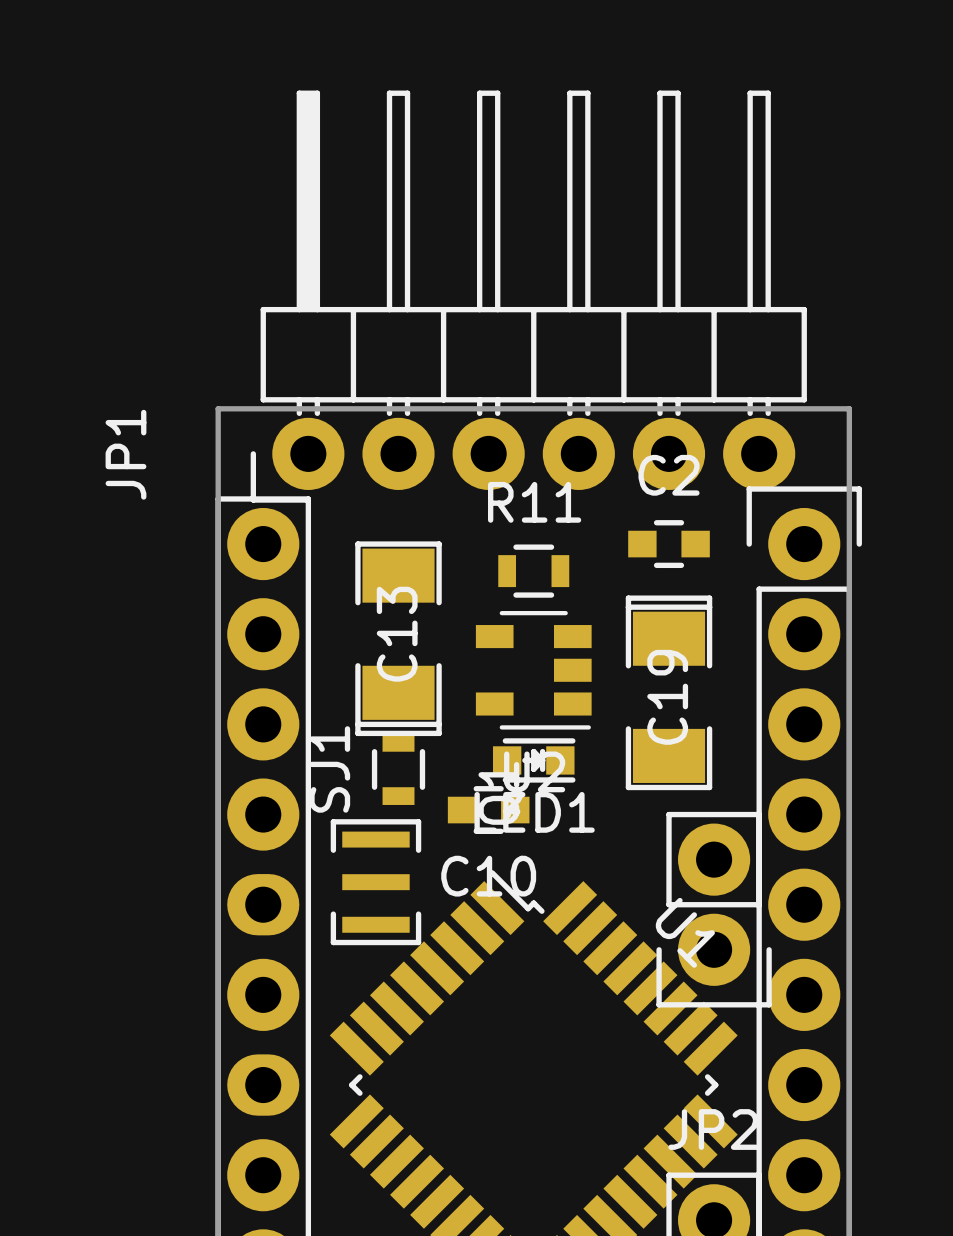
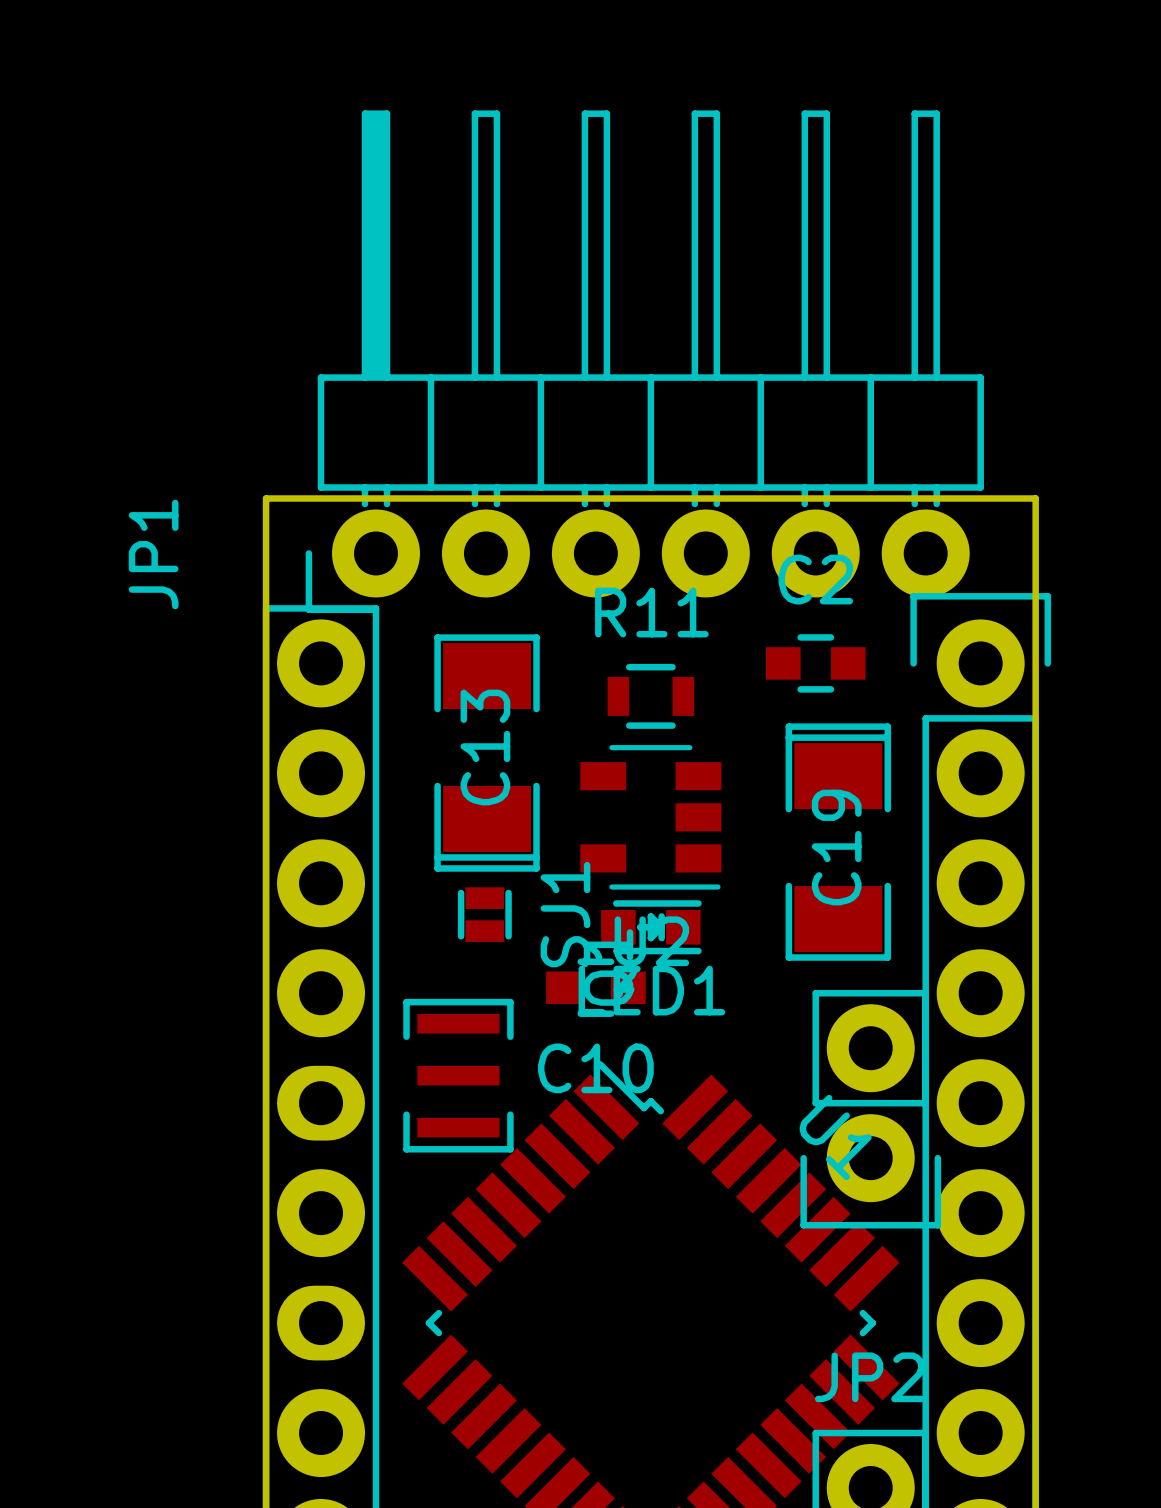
C13 position: (398, 638) -> (487, 753)
C19 position: (669, 692) -> (838, 842)
SJ1 footprint: [371, 733, 426, 805] -> [457, 887, 512, 942]
SJ1 name position: SJ1 (329, 769) -> SJ1 (565, 914)

